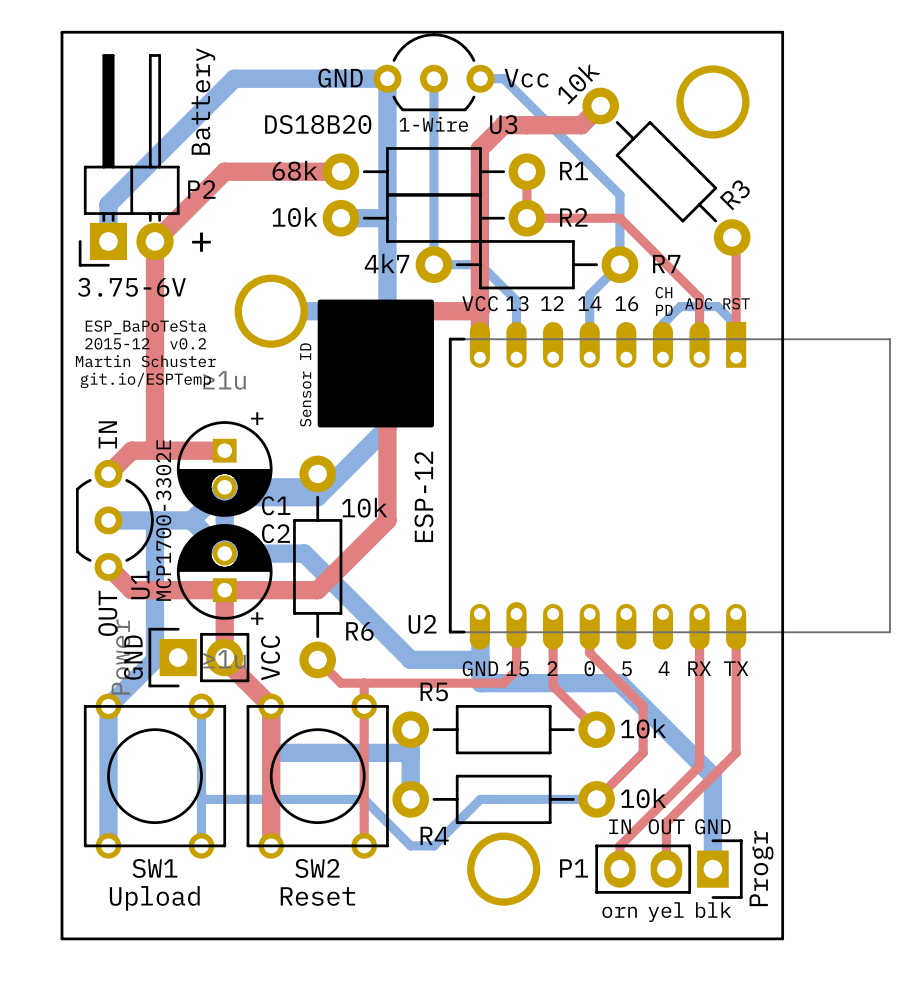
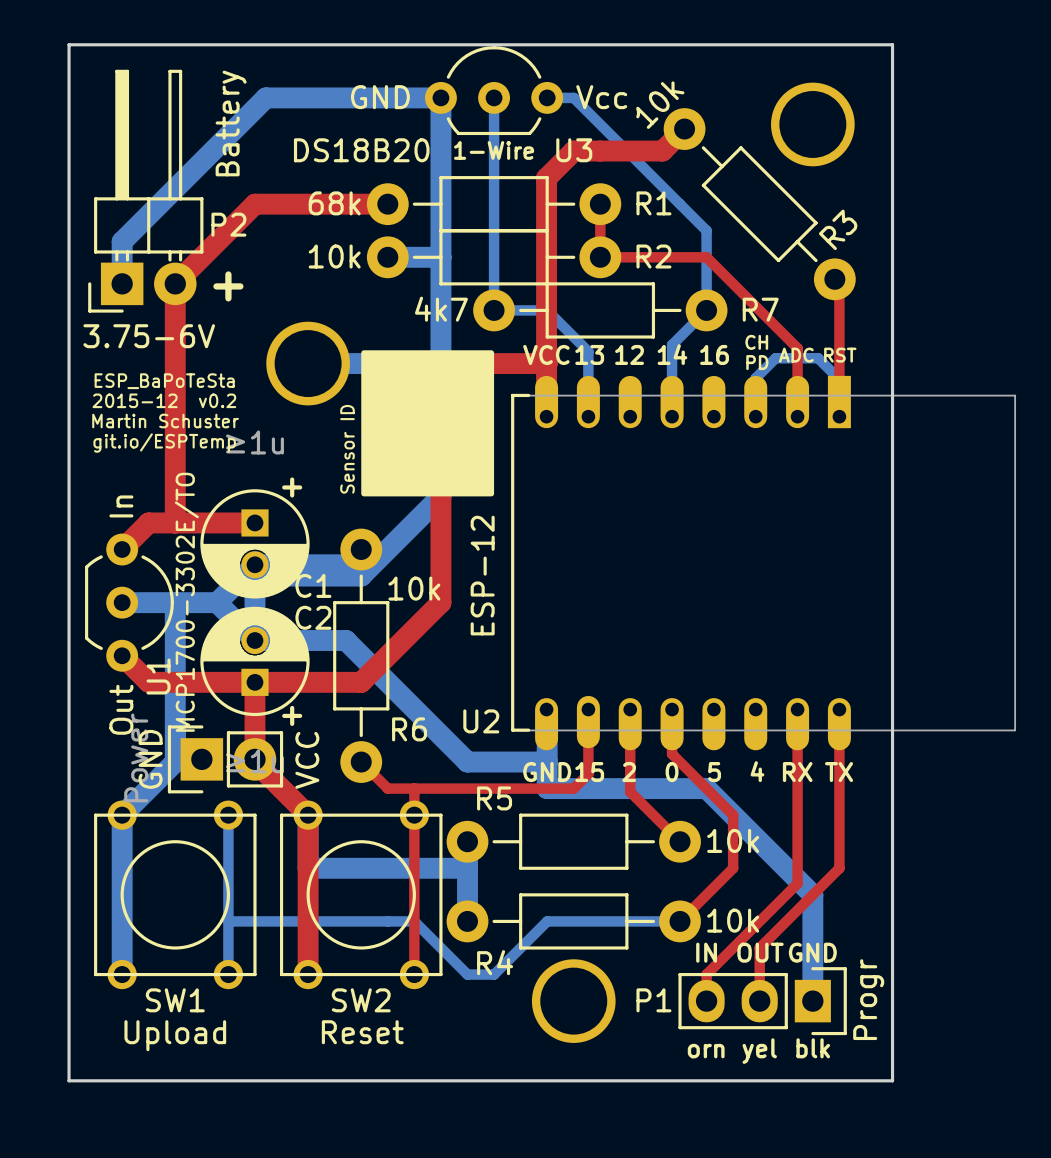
text: IN (107, 434) -> In (121, 506)
U1 value: MCP1700-3302E (163, 520) -> MCP1700-3302E/TO (186, 602)
text: OUT (107, 613) -> Out (121, 709)

